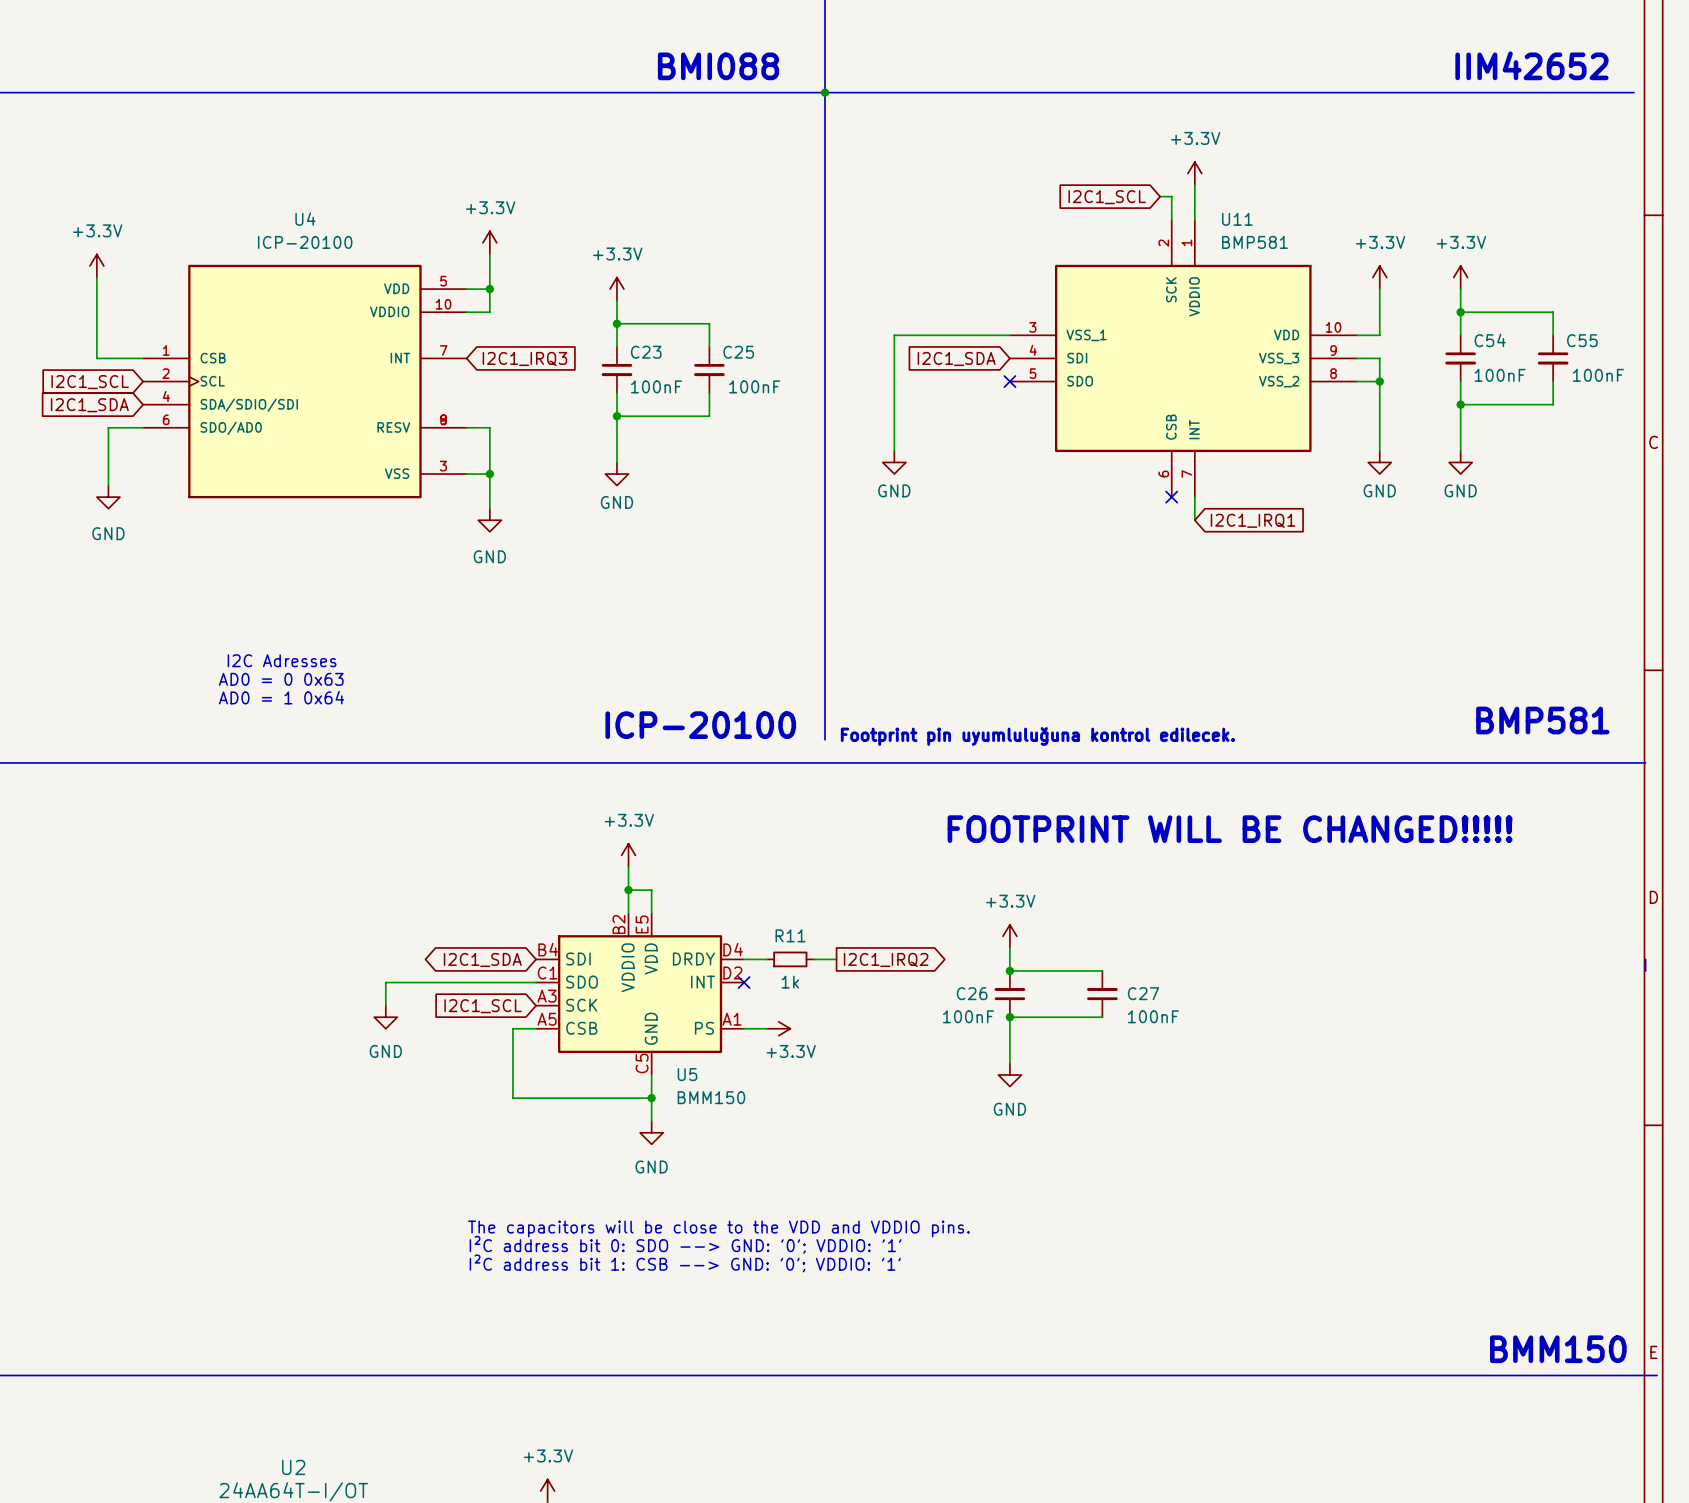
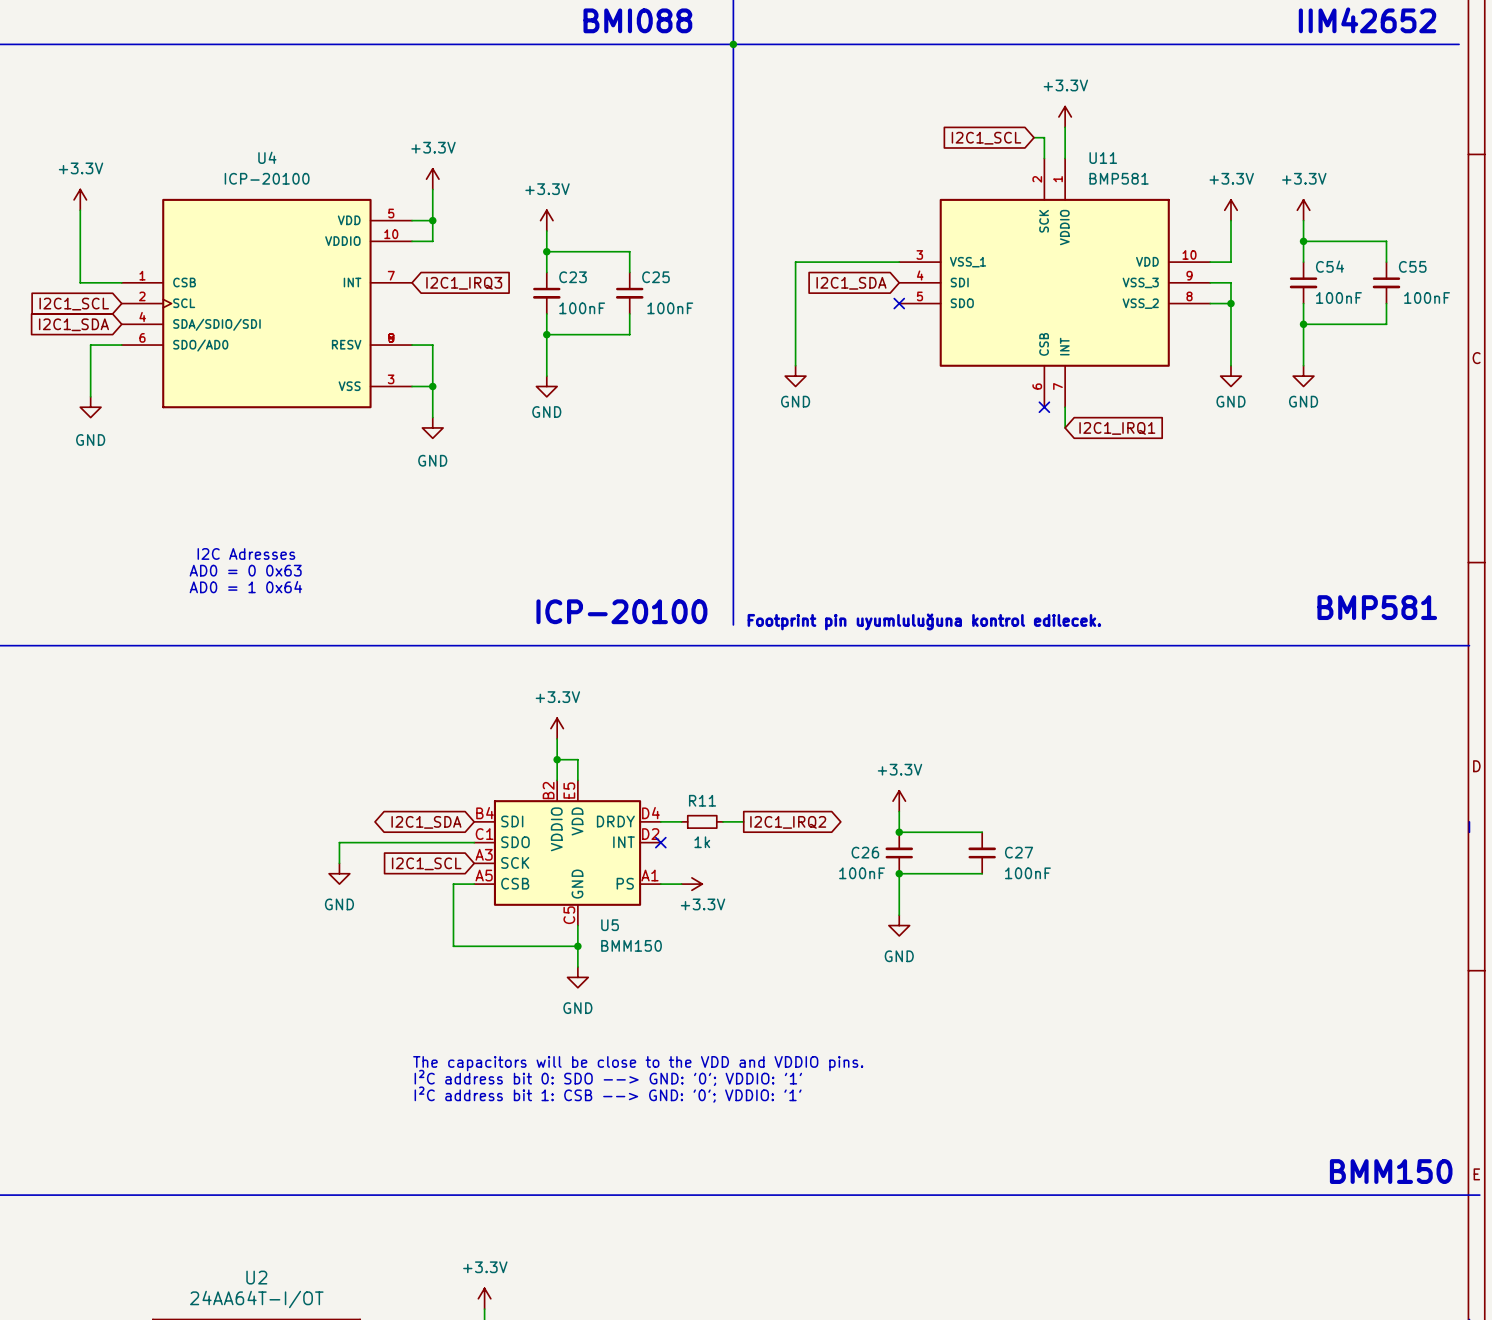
text: FOOTPRINT WILL BE CHANGED!!!!! (1230, 829) -> none

